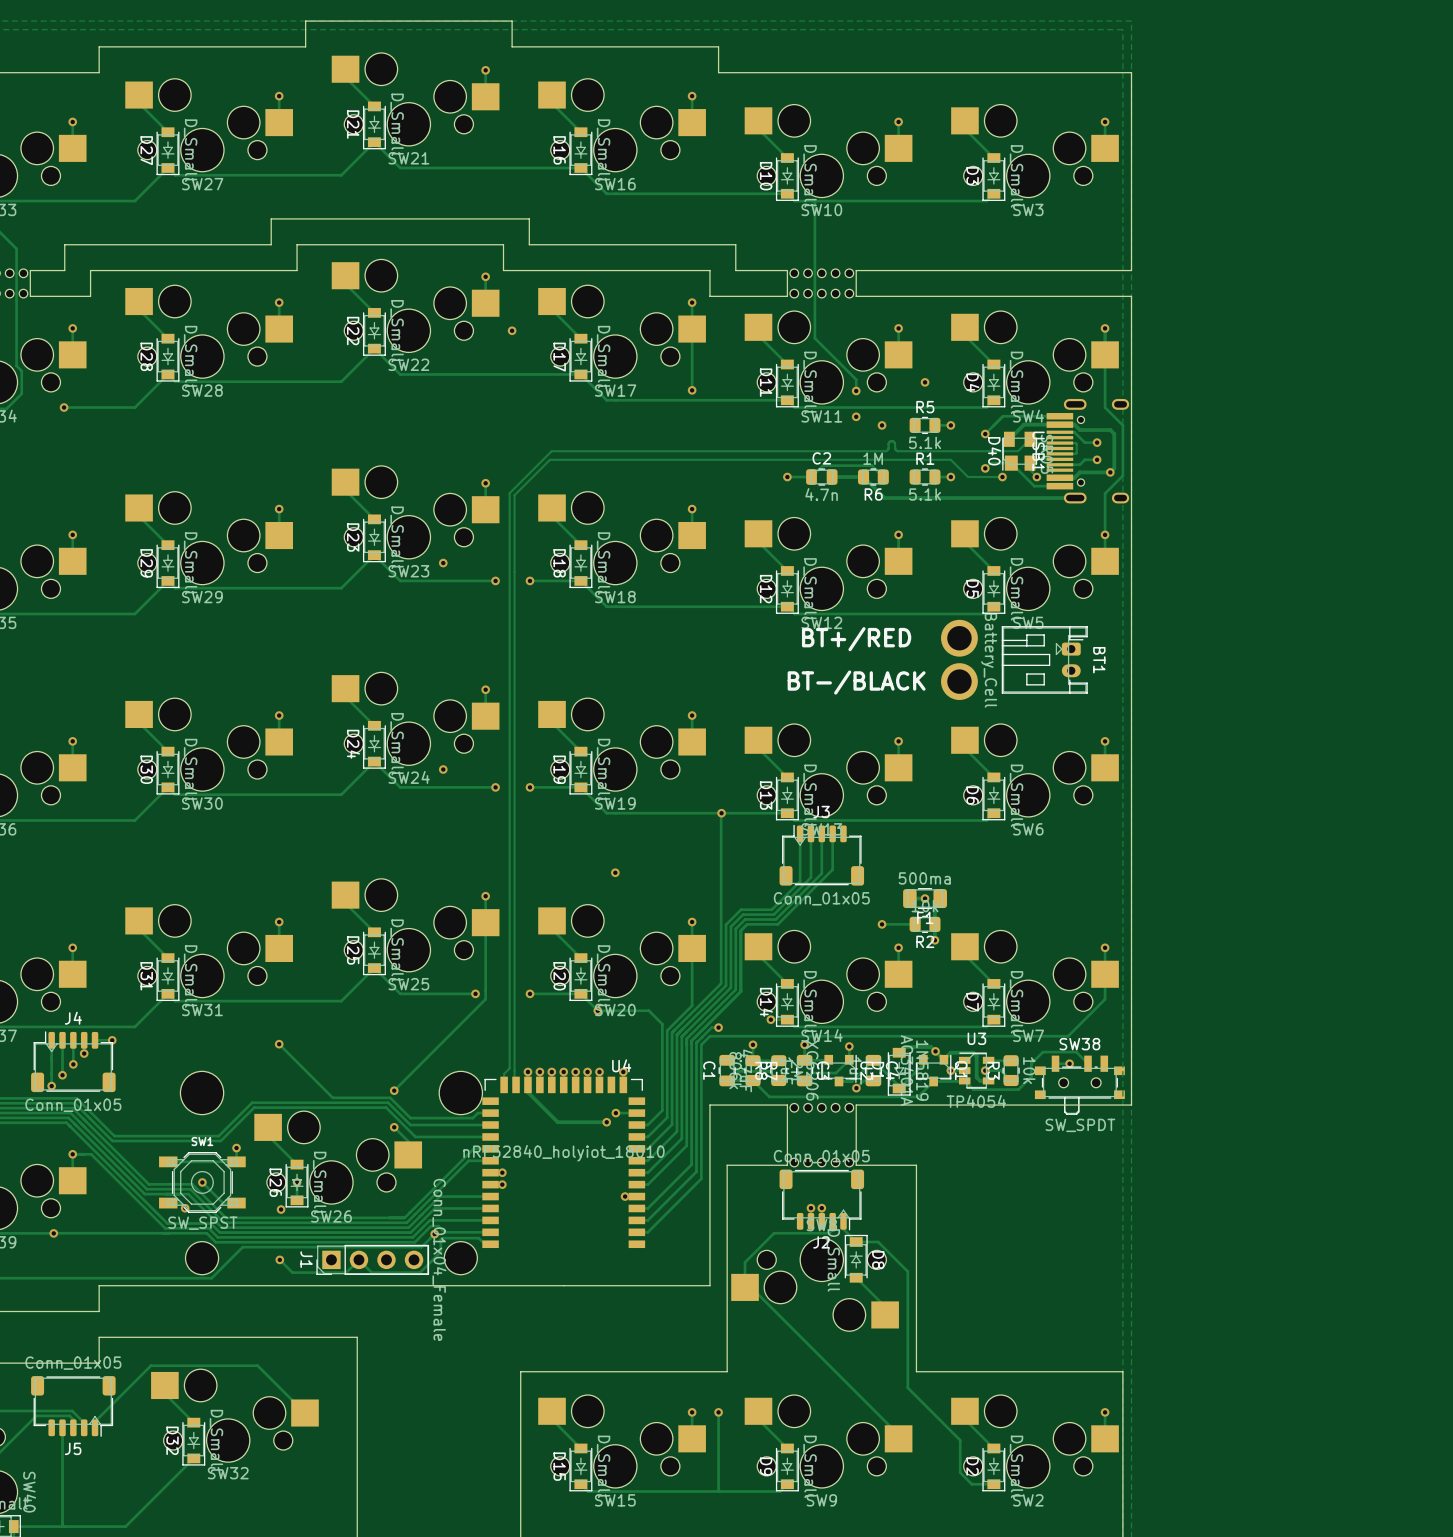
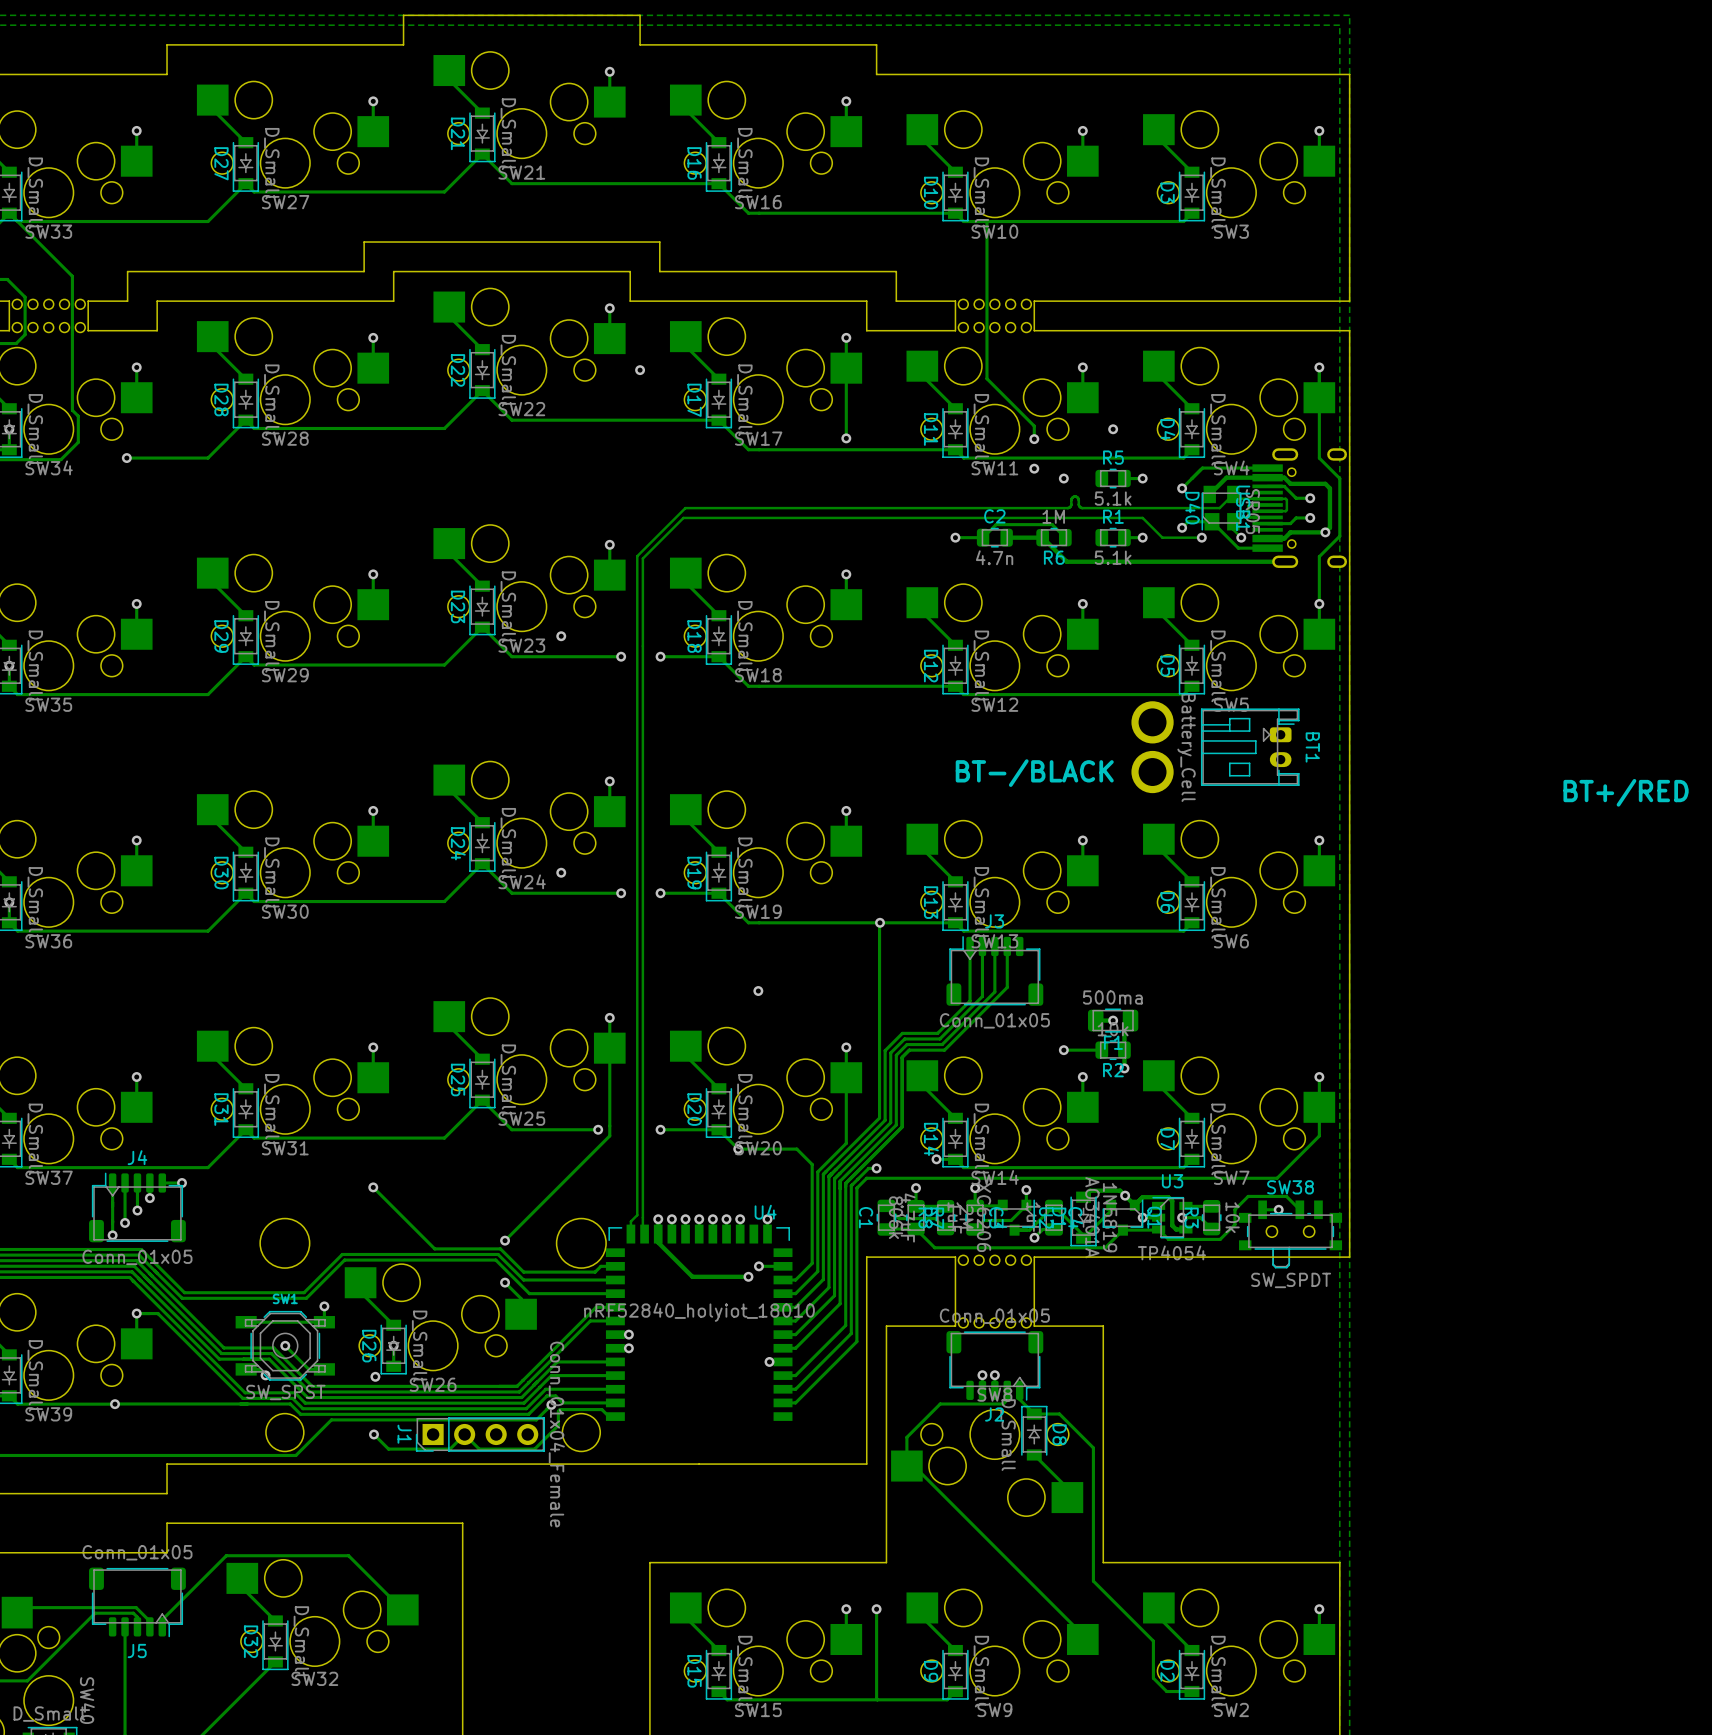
text: BT+/RED (856, 639) -> none
text: none -> BT+/RED (1626, 792)

